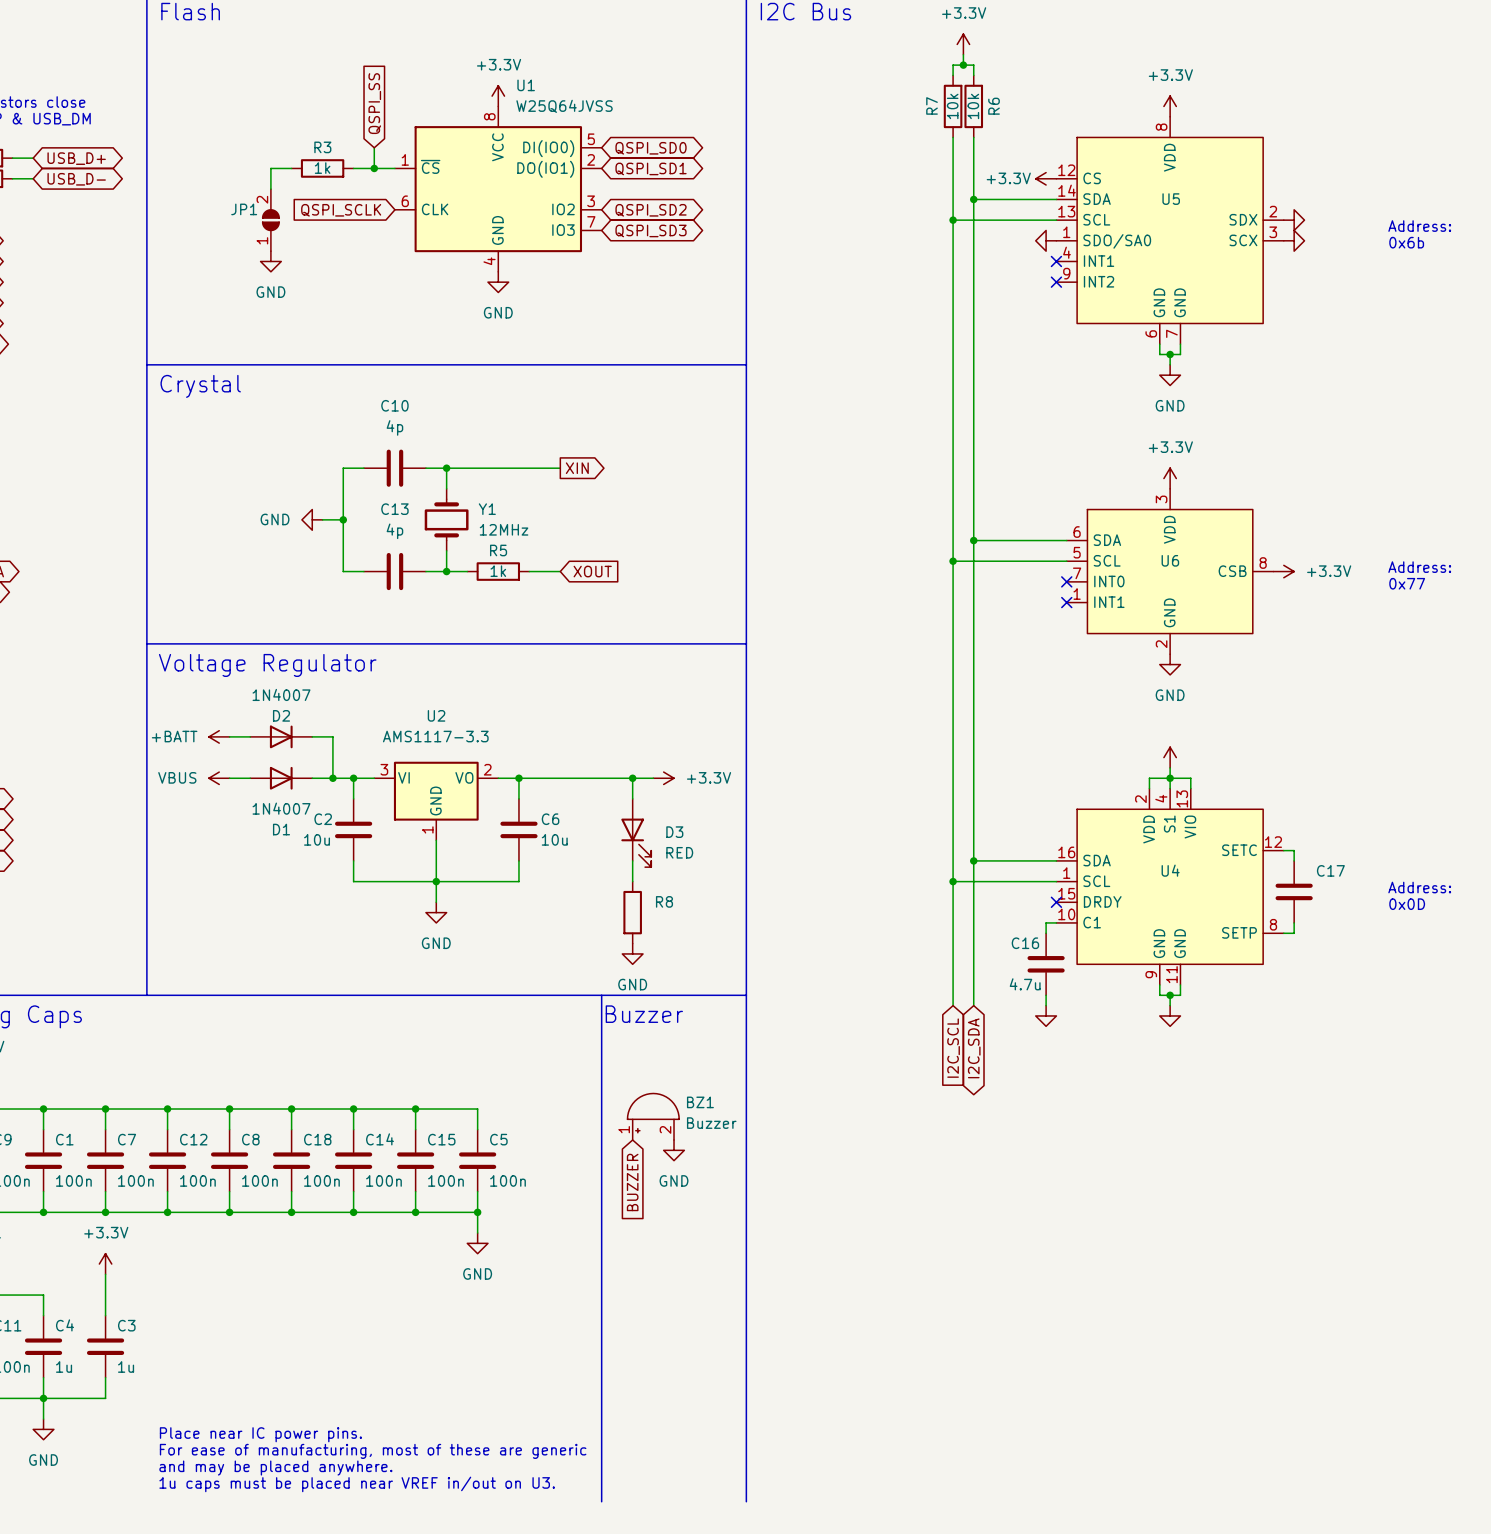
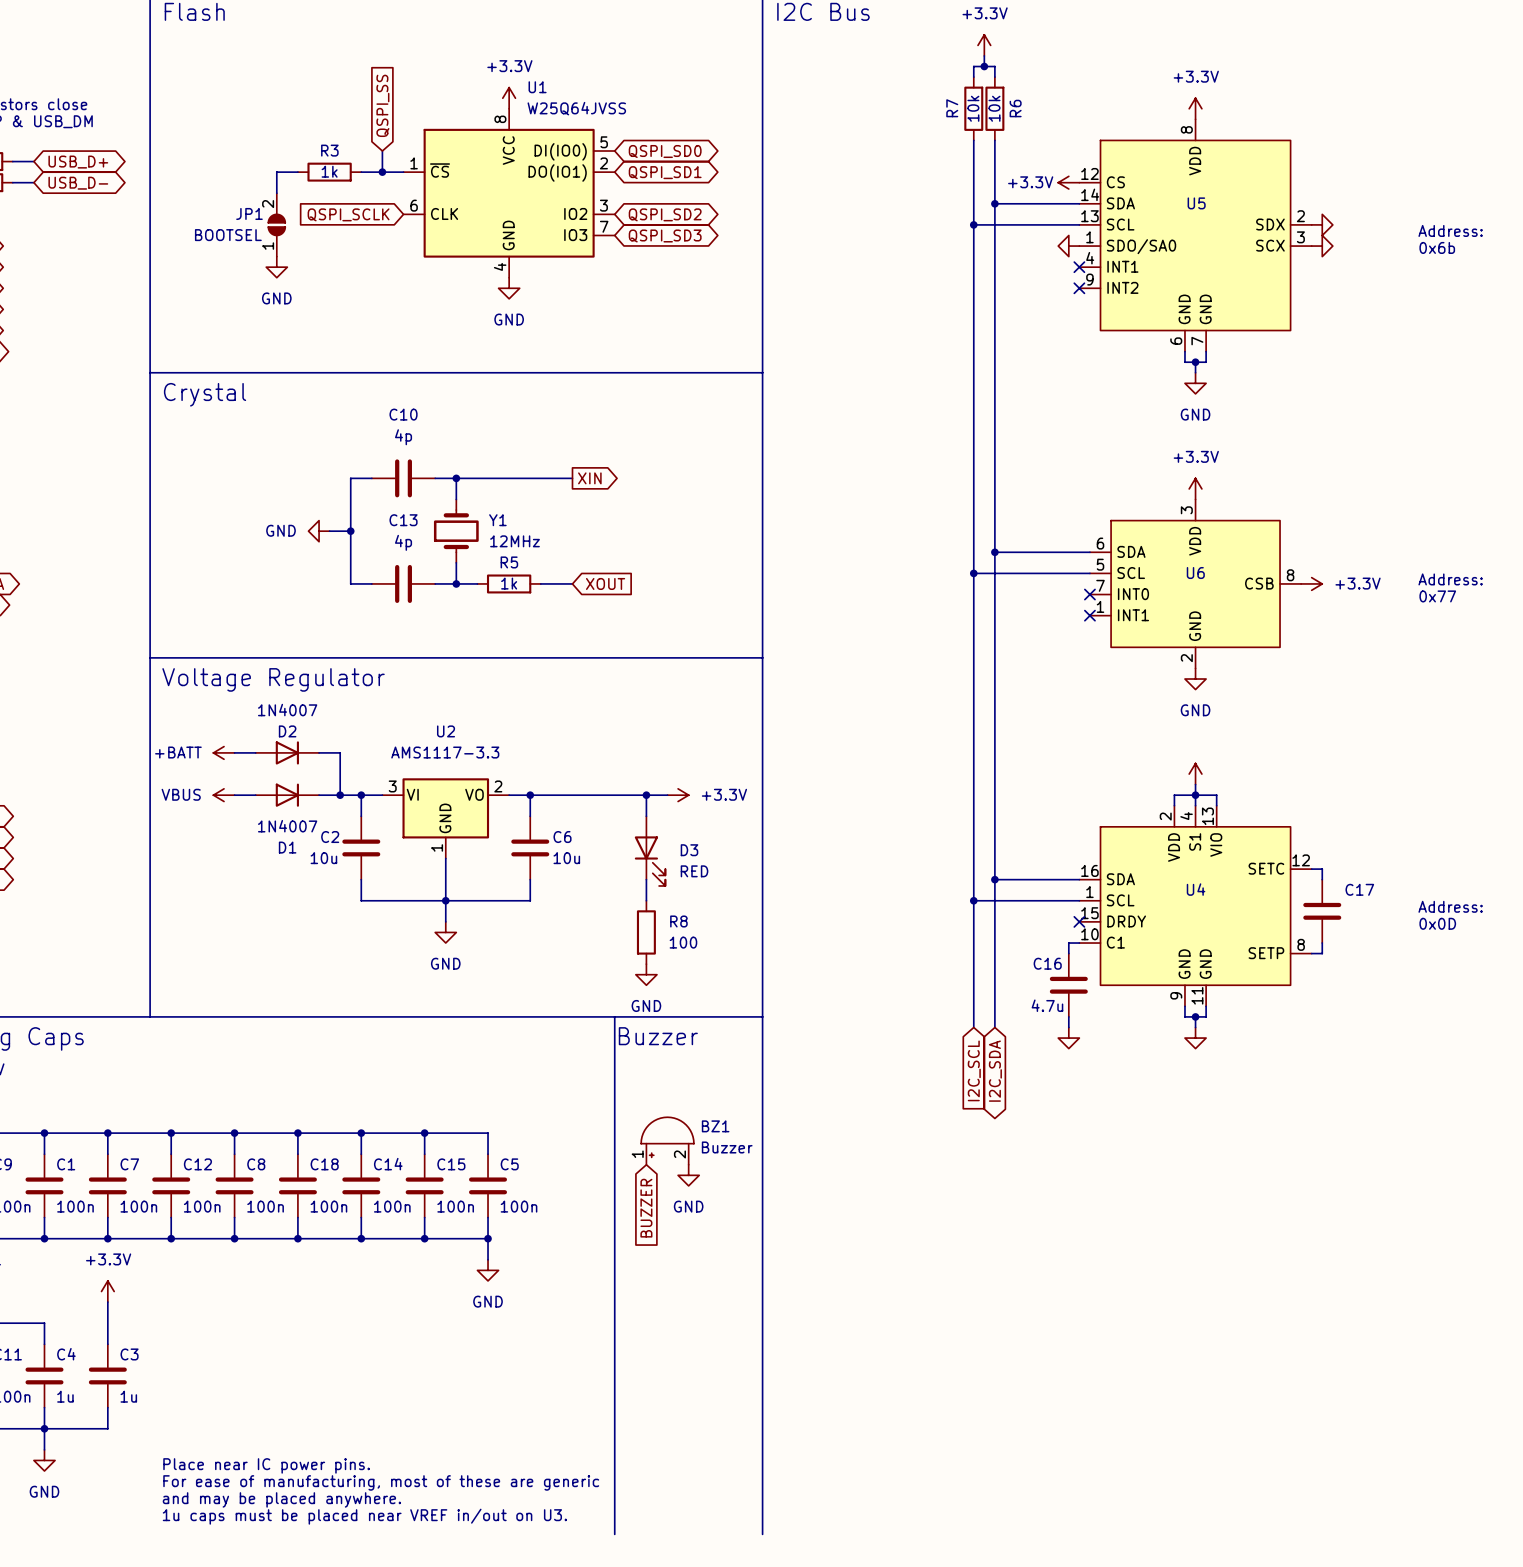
JP1 value: none -> BOOTSEL (228, 235)
R8 value: none -> 100 (683, 942)

